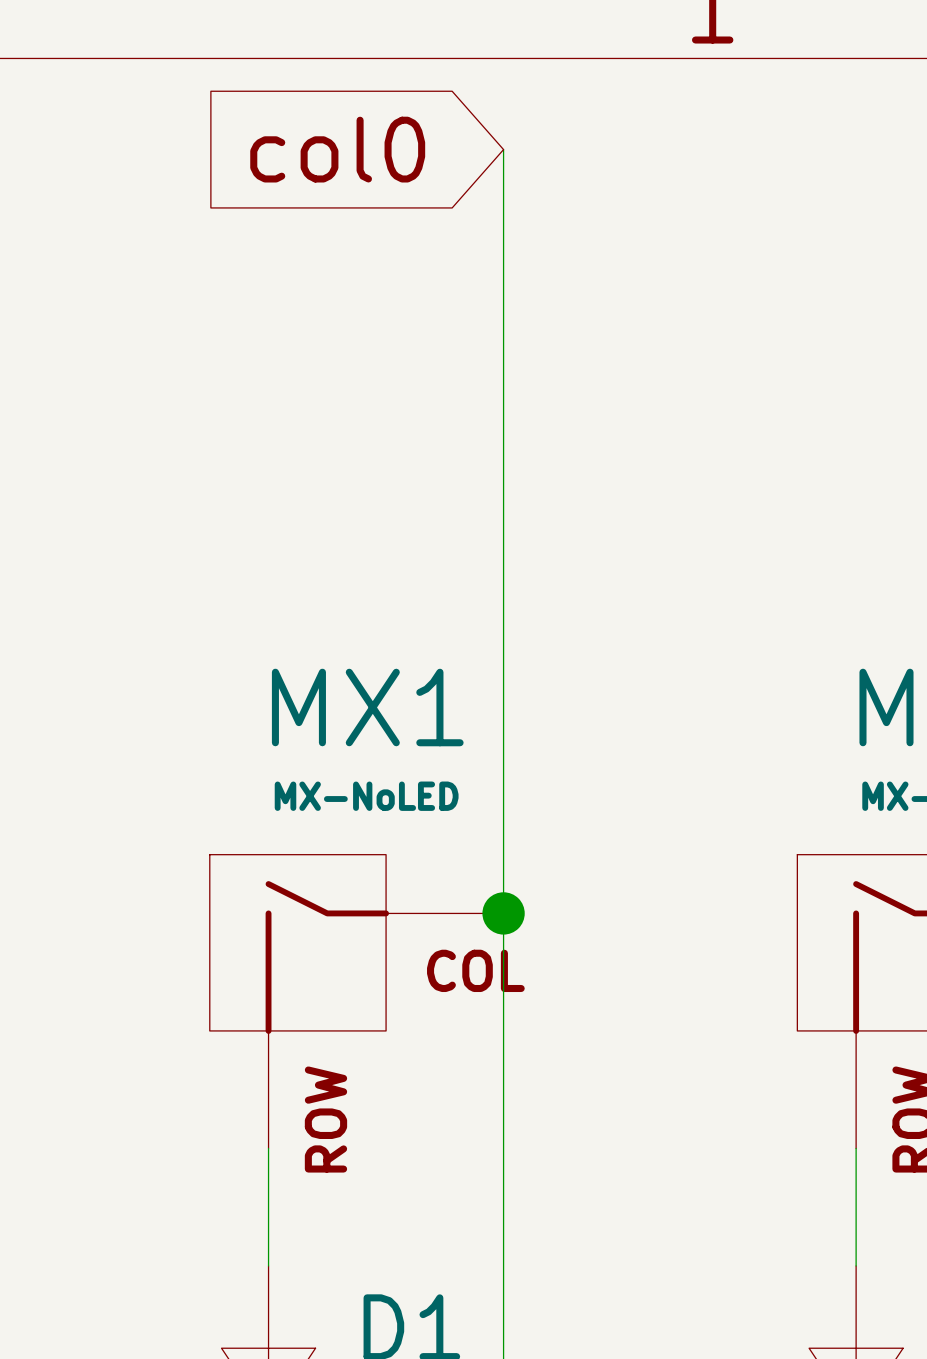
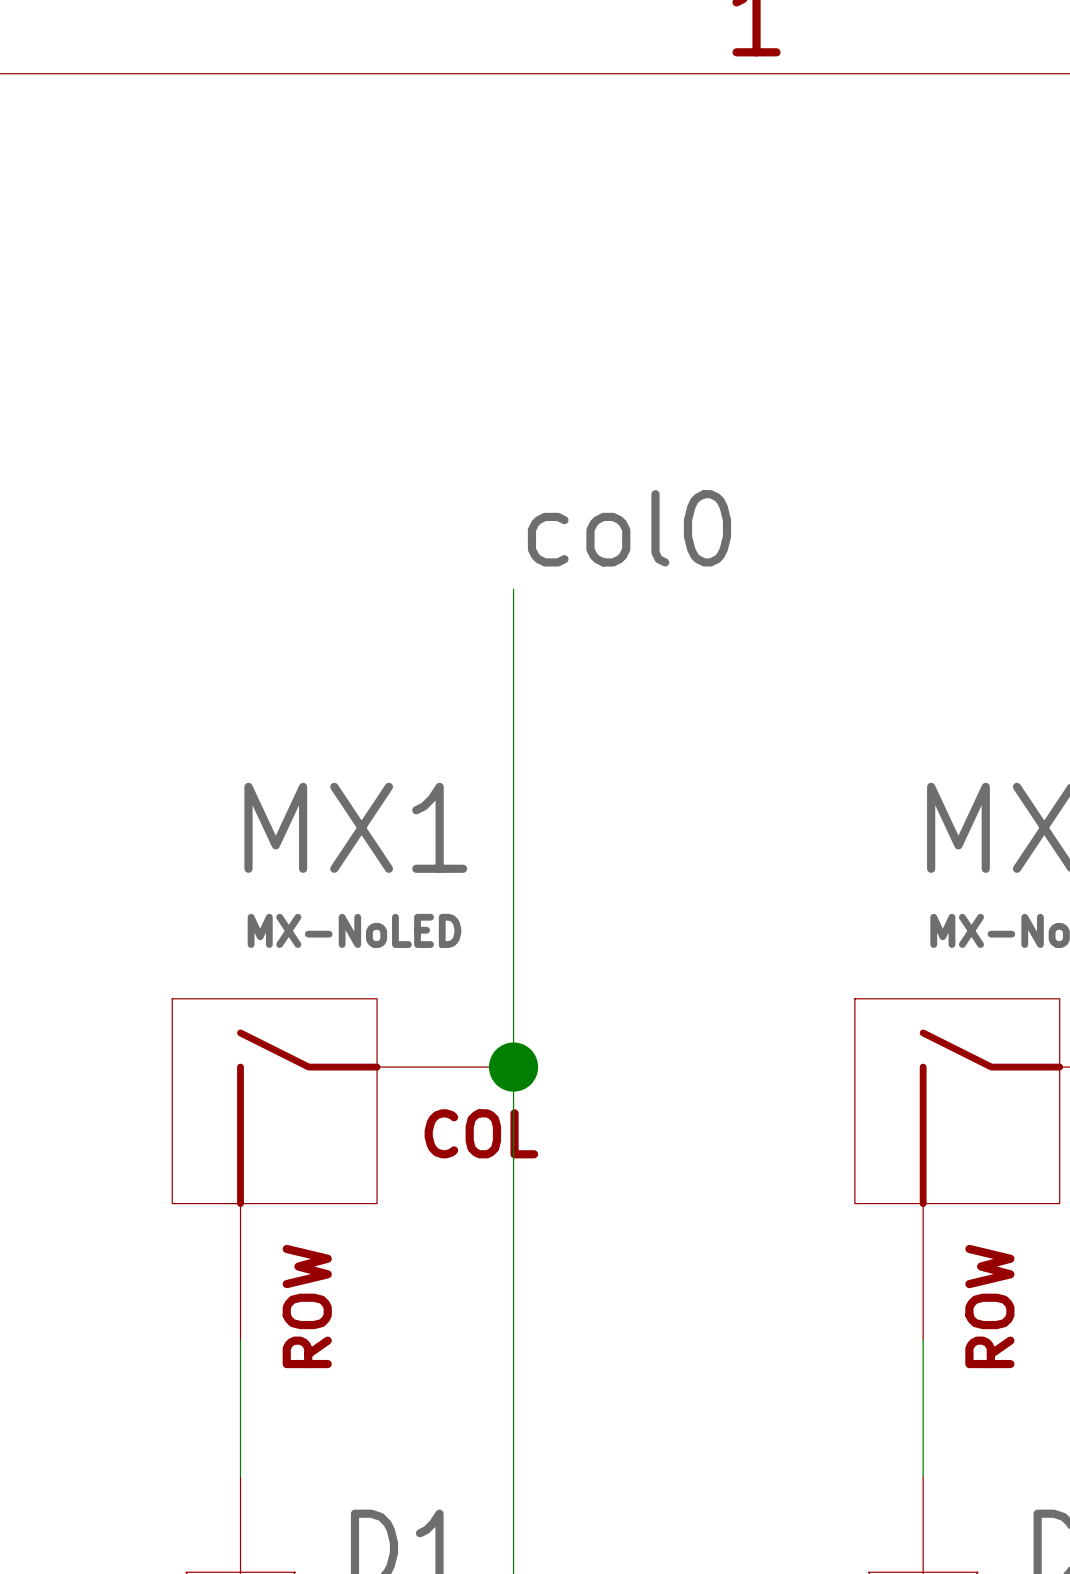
global label: col0 (337, 149) -> none
wire: (503, 149) (503, 502) -> none
label: none -> col0 (629, 528)

